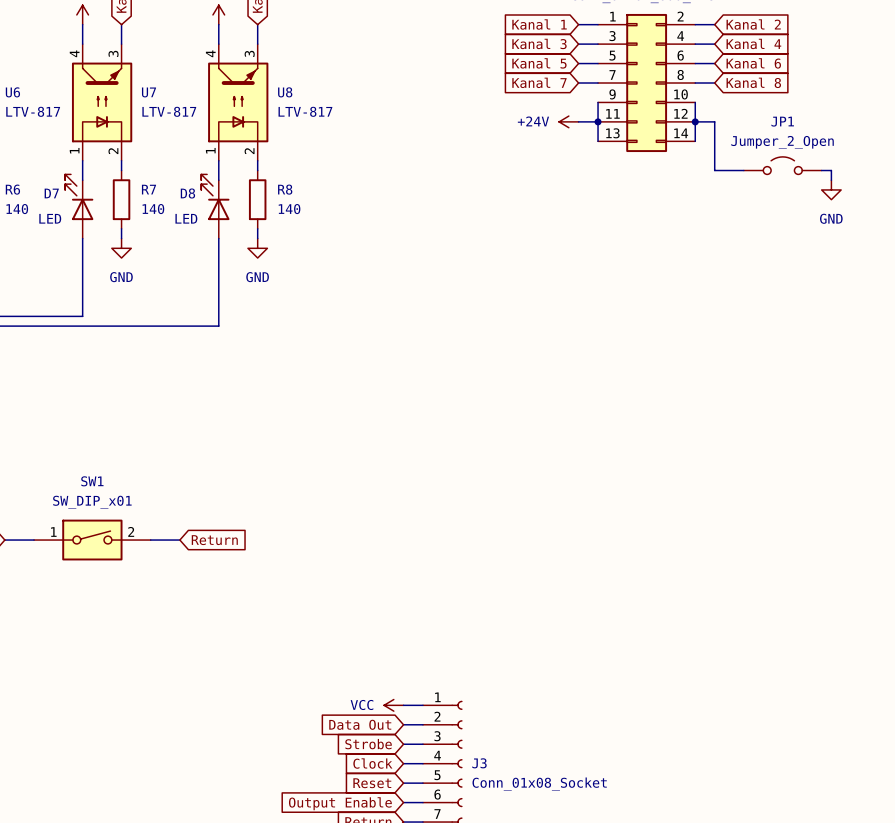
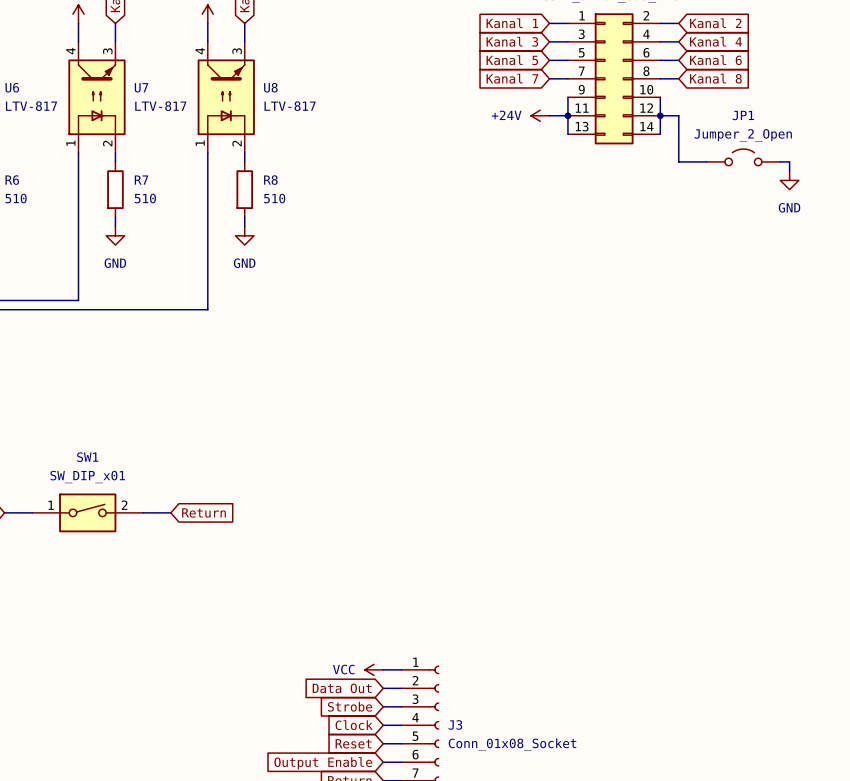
D7: LED (79, 206) -> none
D8: LED (215, 206) -> none
R6 value: 140 (17, 209) -> 510 (16, 198)
R7 value: 140 (153, 209) -> 510 (145, 198)
R8 value: 140 (289, 209) -> 510 (274, 198)

